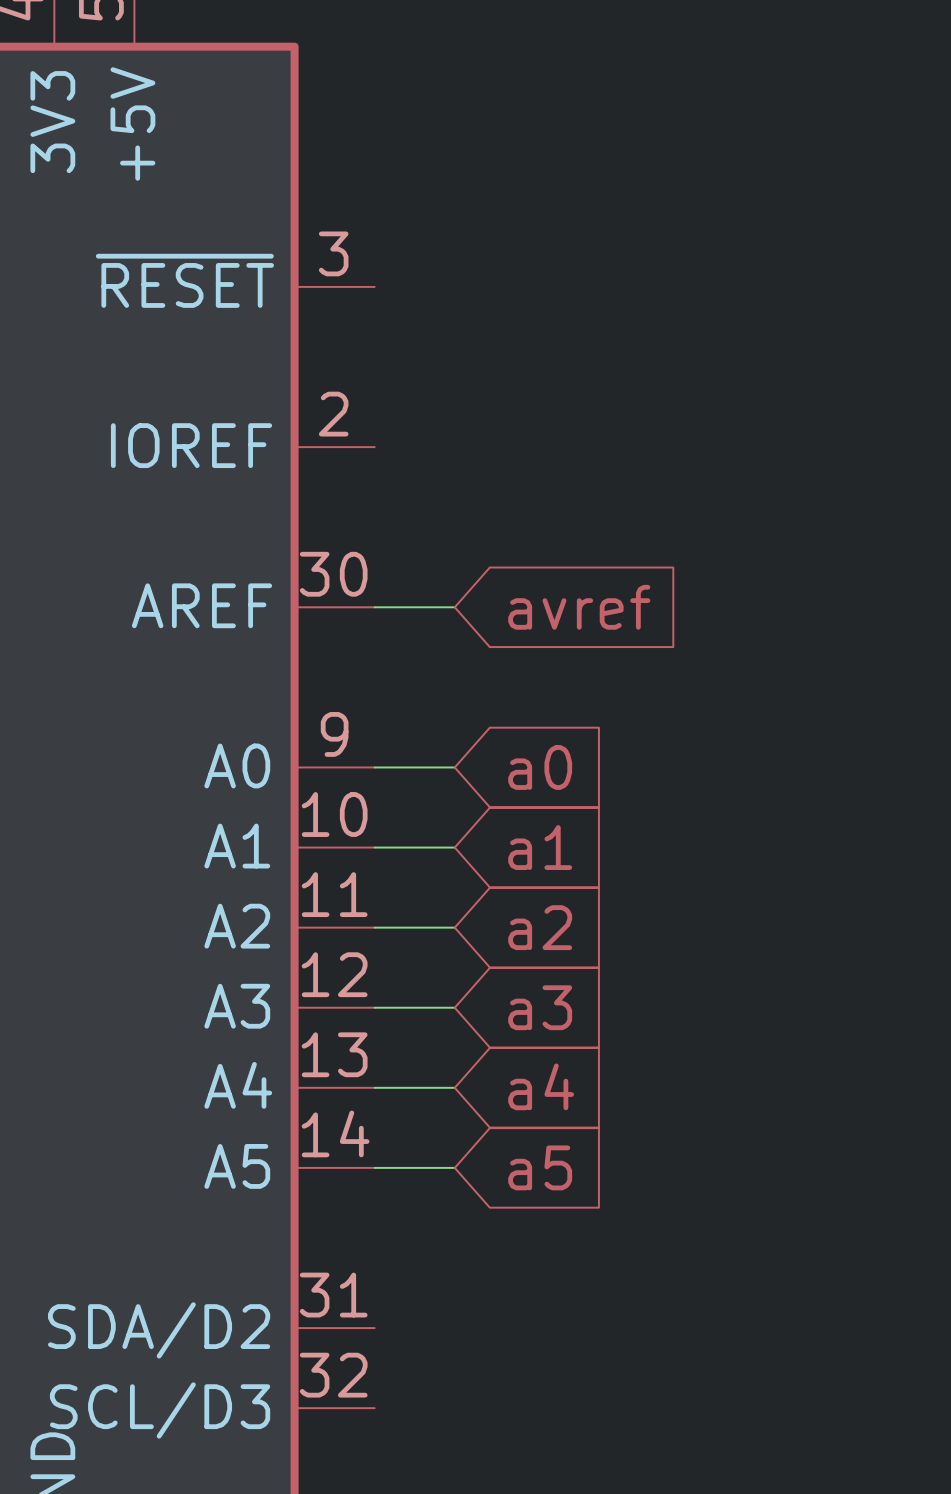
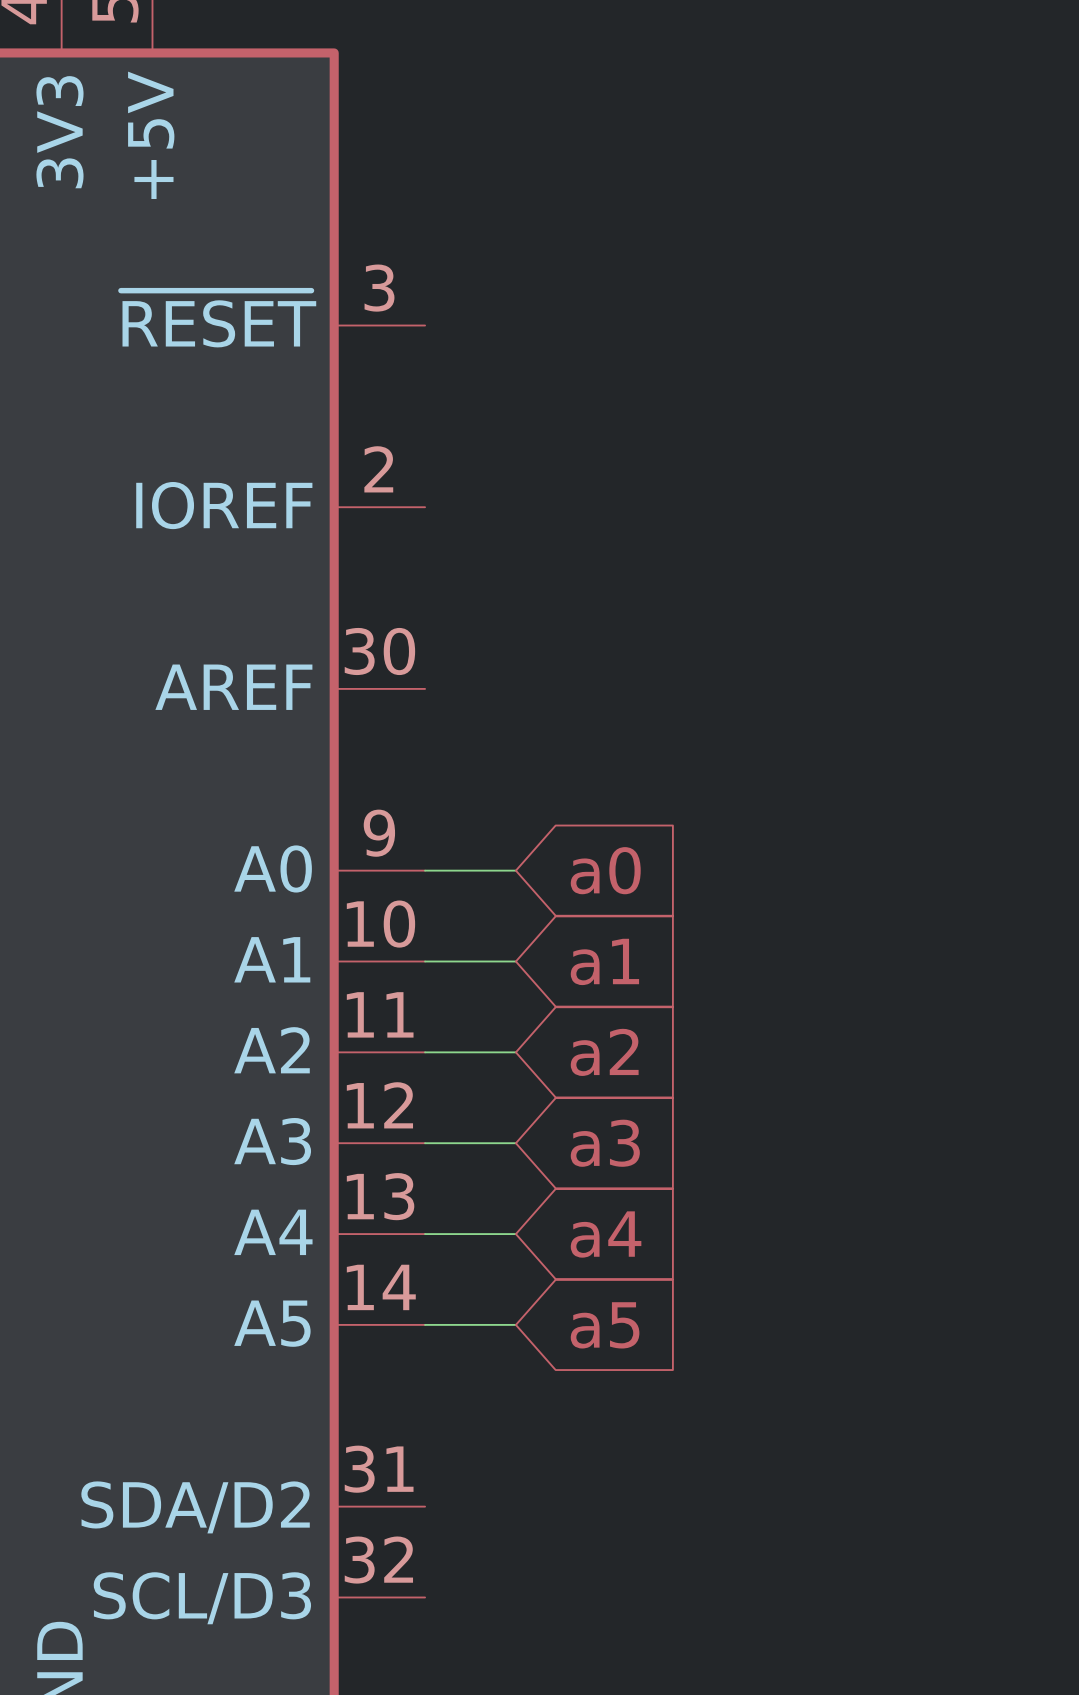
wire: (374, 607) (454, 607) -> none
global label: avref (579, 607) -> none

